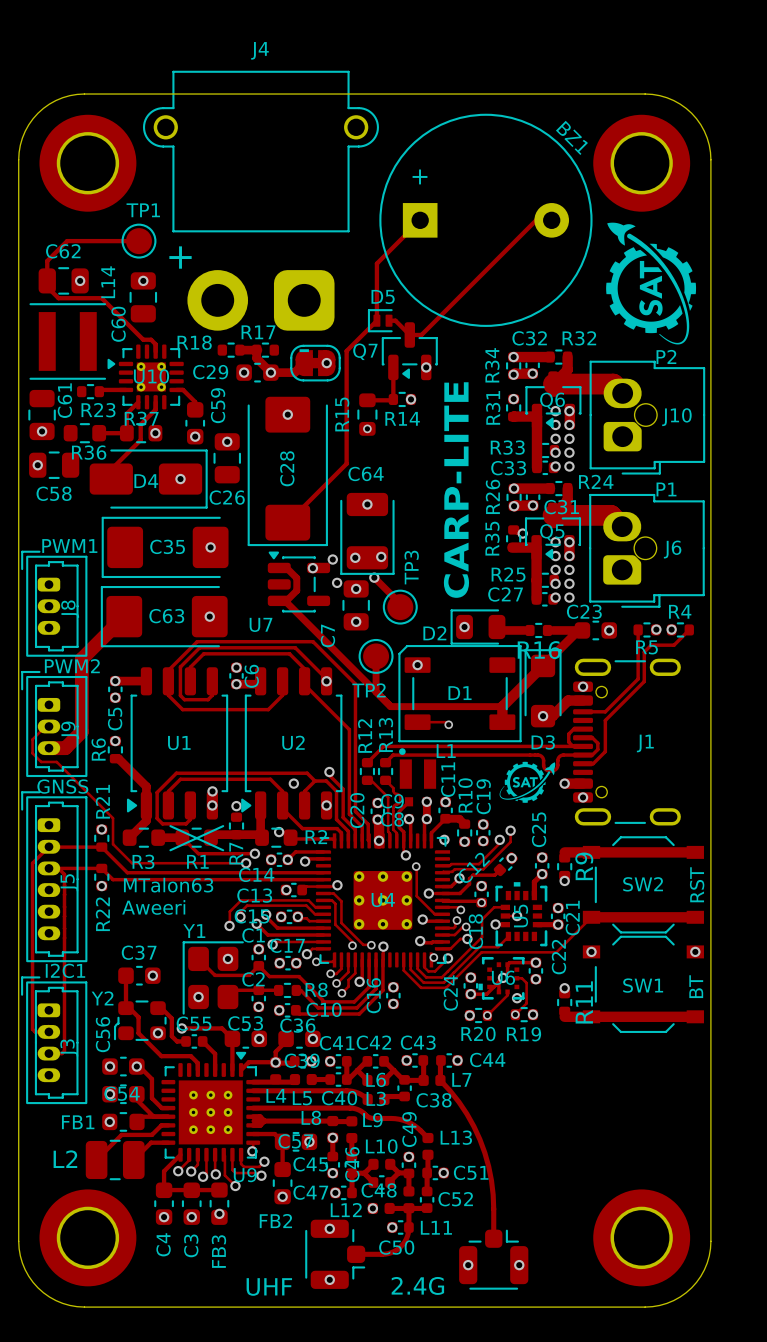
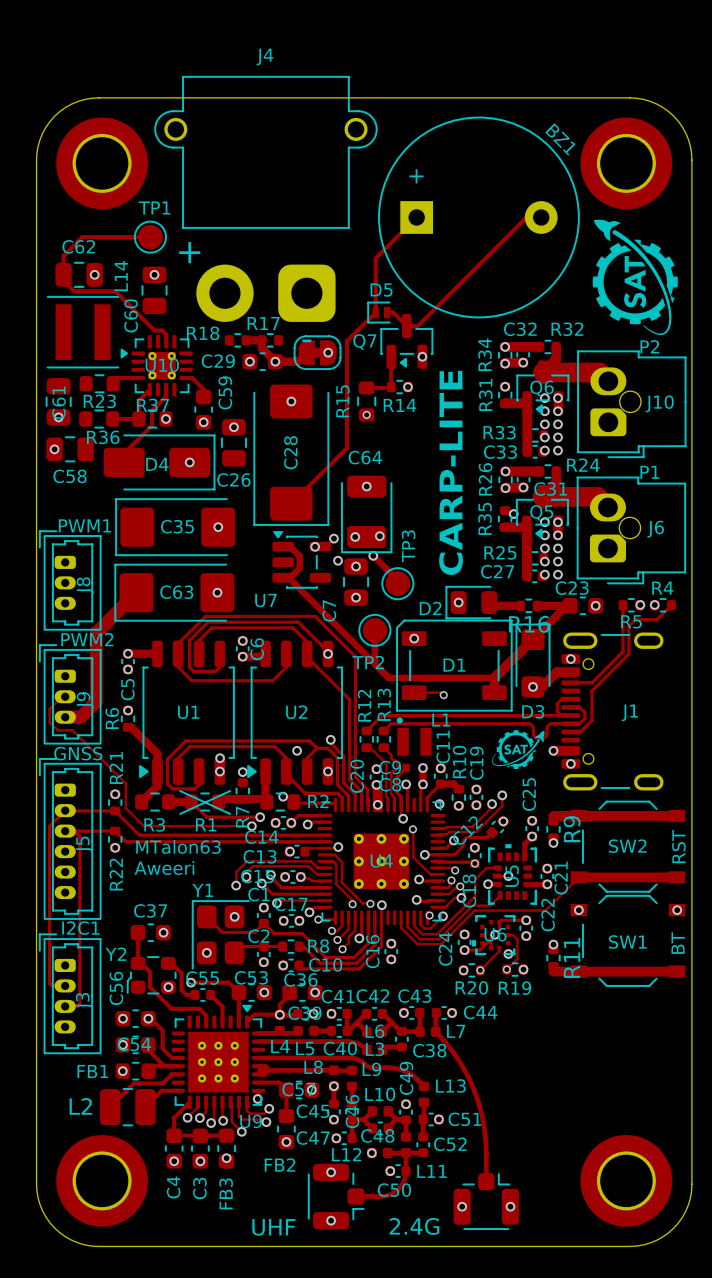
R23 footprint: [77, 384, 105, 400] -> [79, 374, 120, 394]
C61 name position: C61 (64, 400) -> C61 (59, 402)
R23 name position: R23 (98, 410) -> R23 (99, 401)

